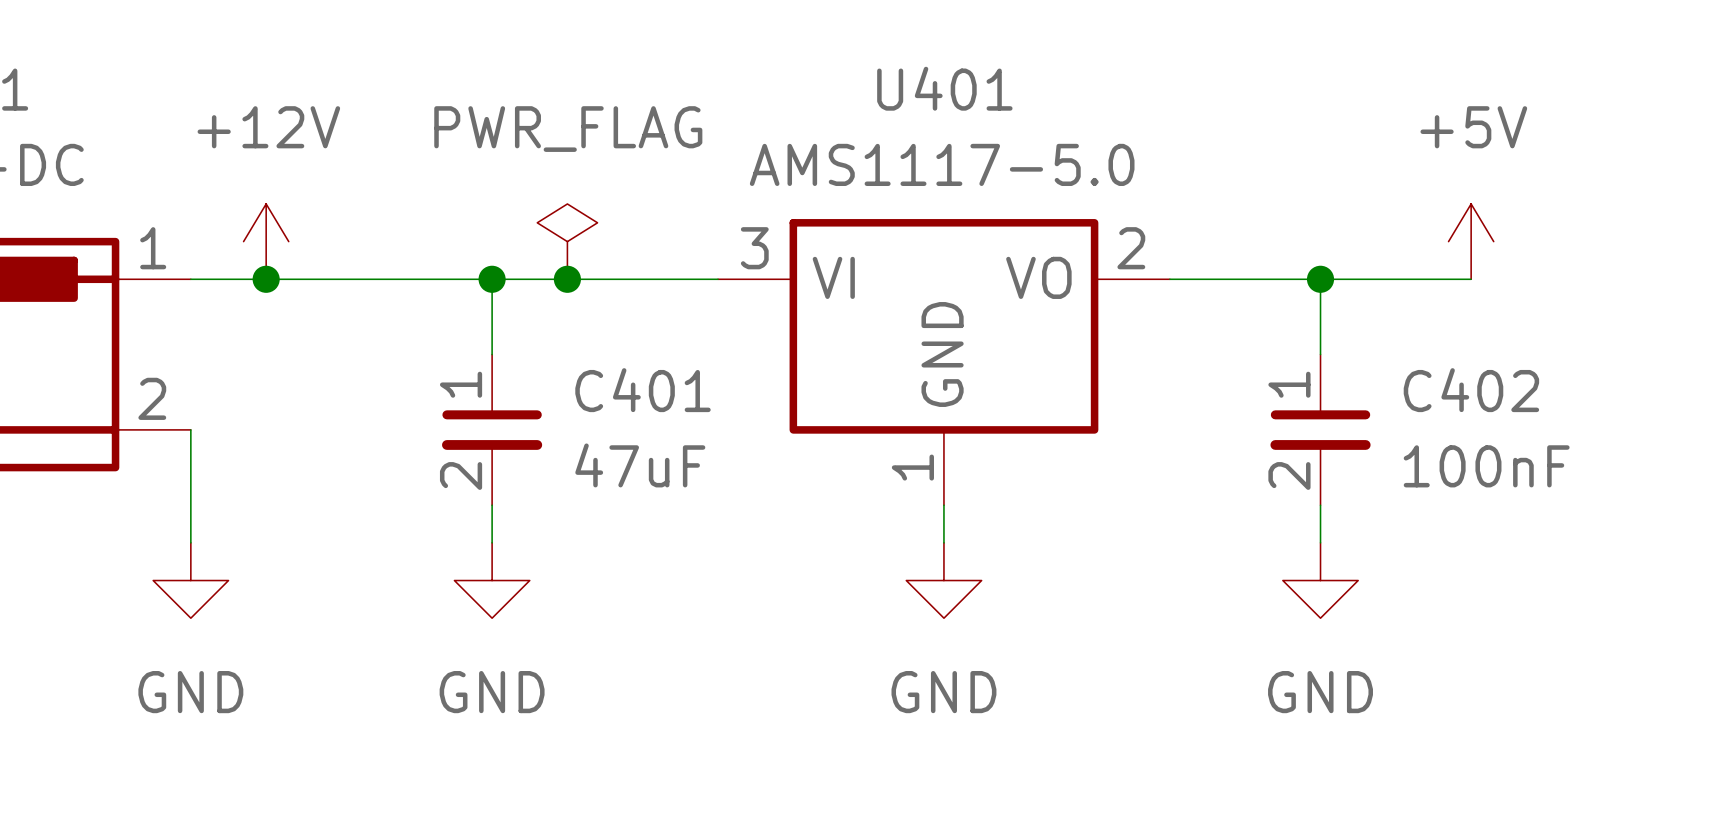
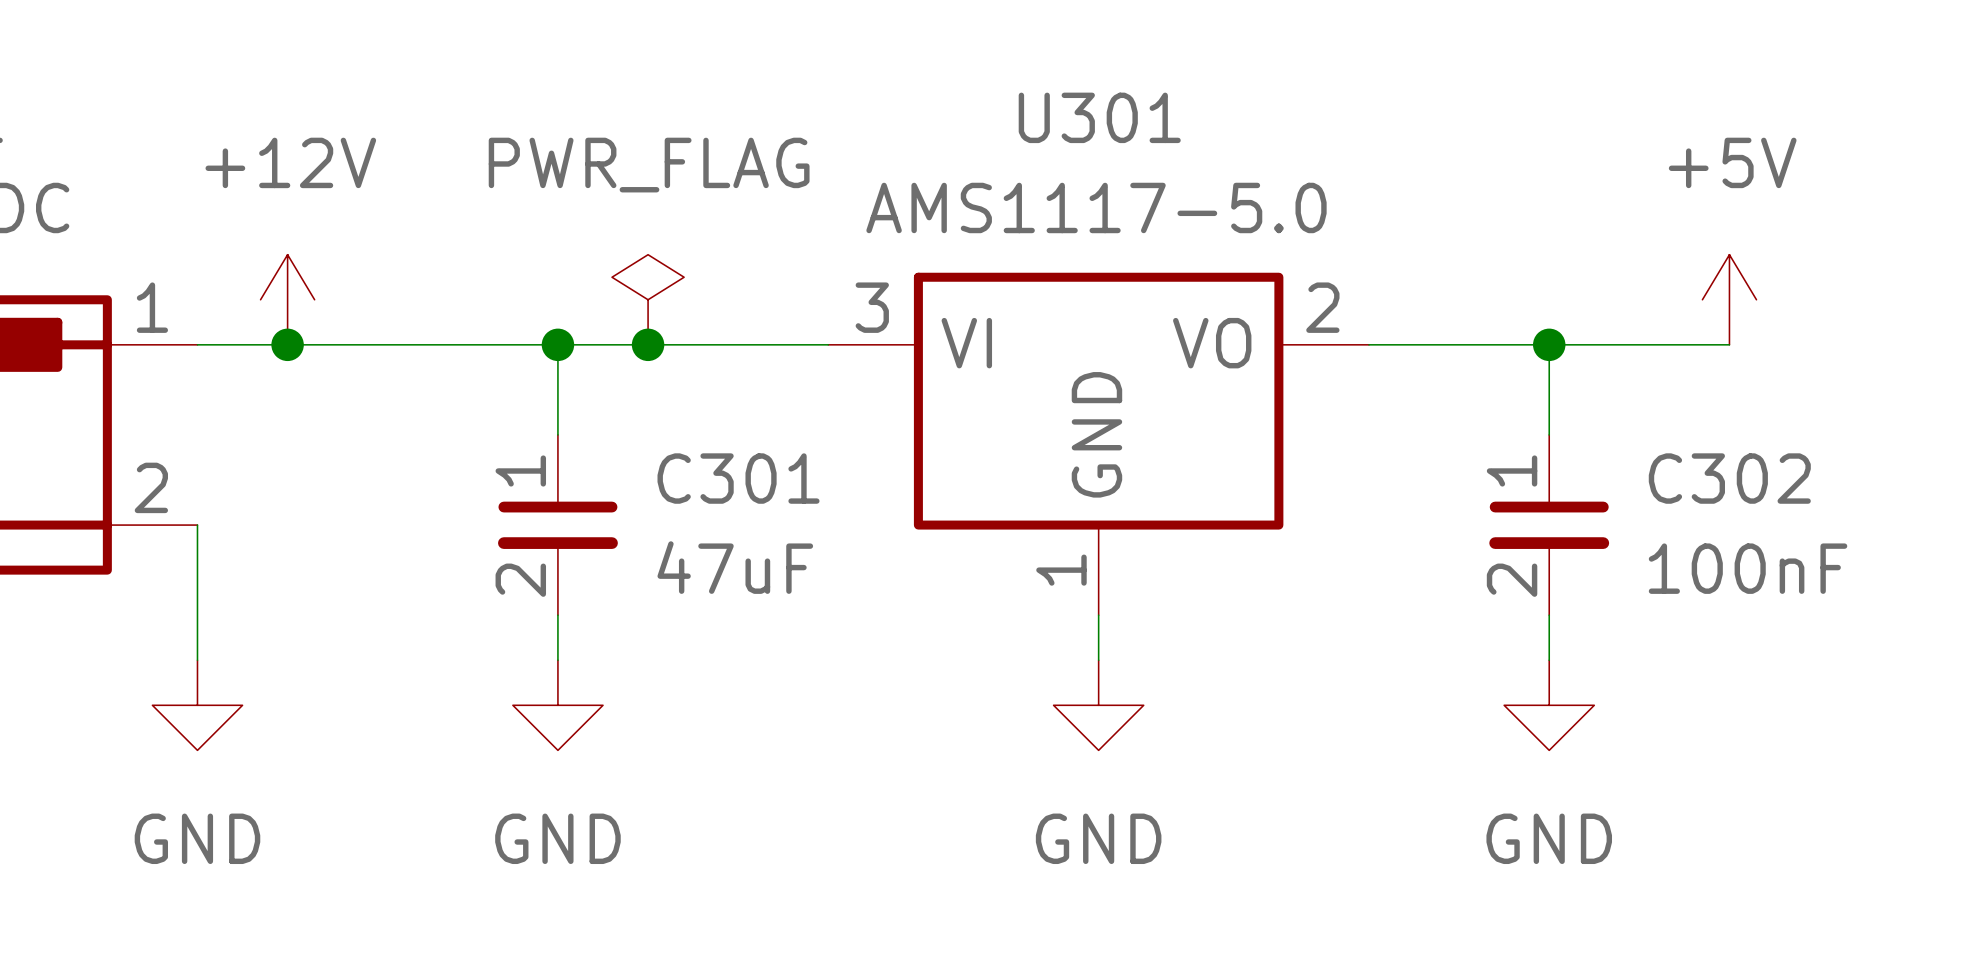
U401 name: U401 (944, 88) -> U301 (1099, 117)
C401 name: C401 (643, 390) -> C301 (738, 478)
C402 name: C402 (1471, 390) -> C302 (1729, 478)

